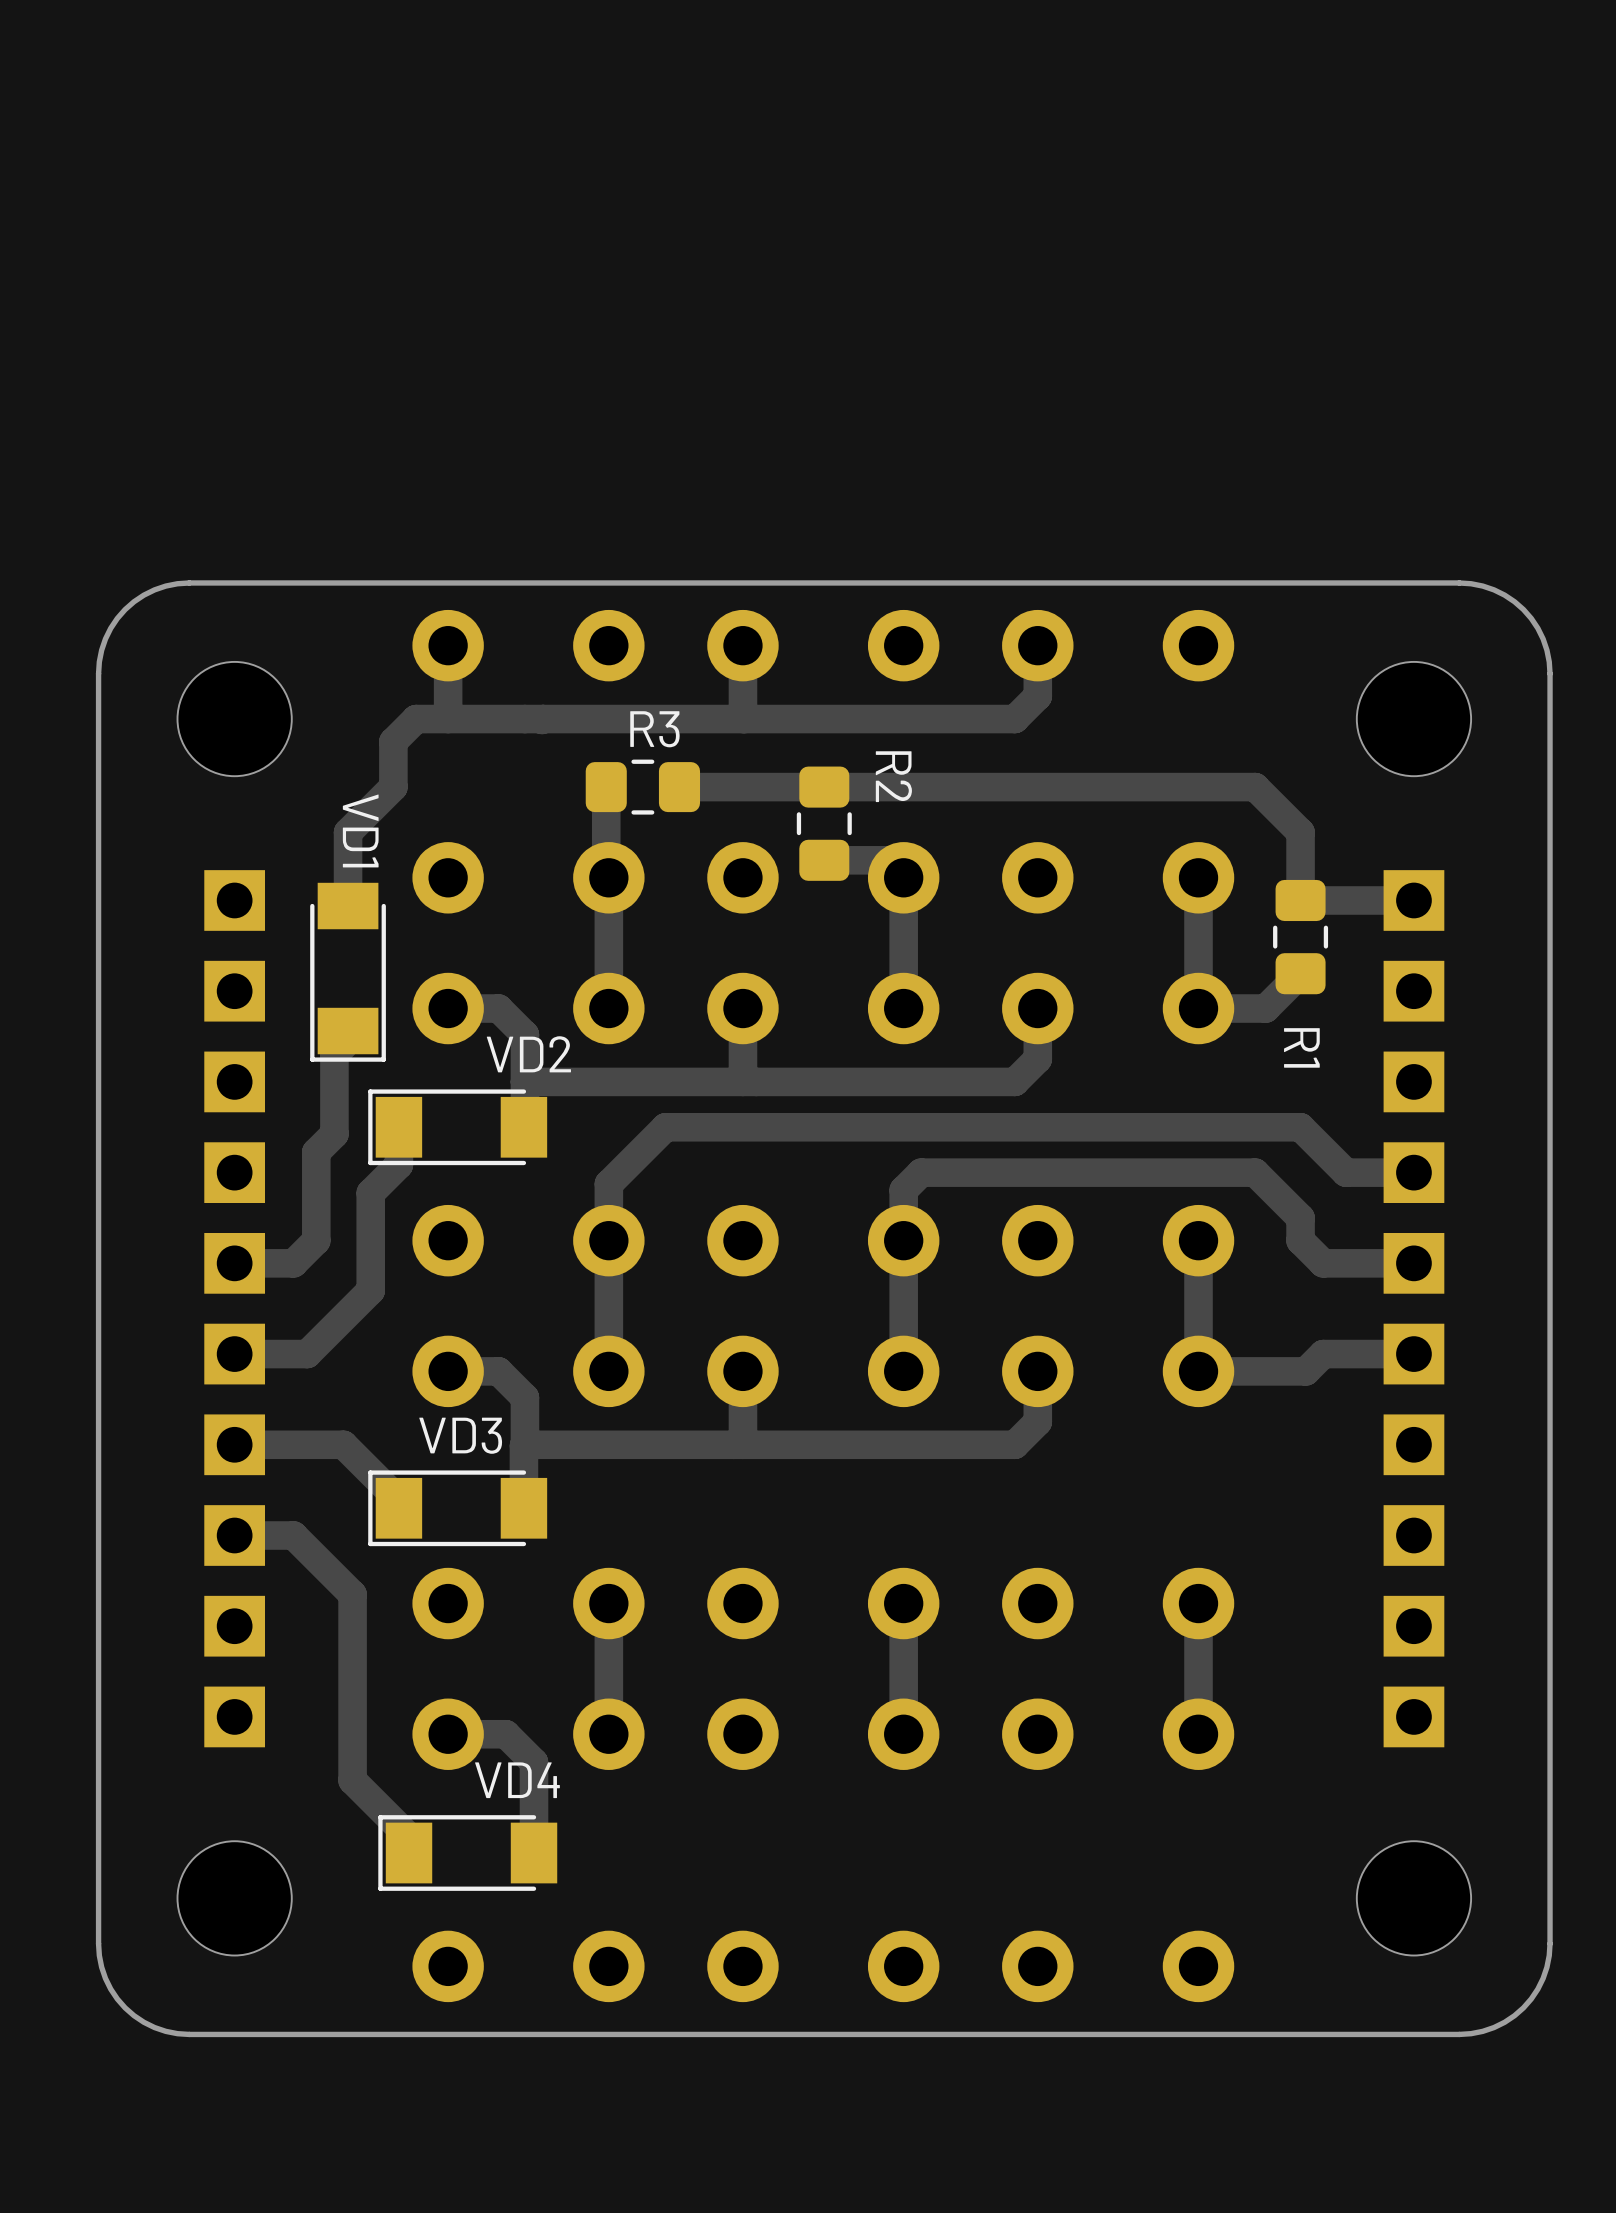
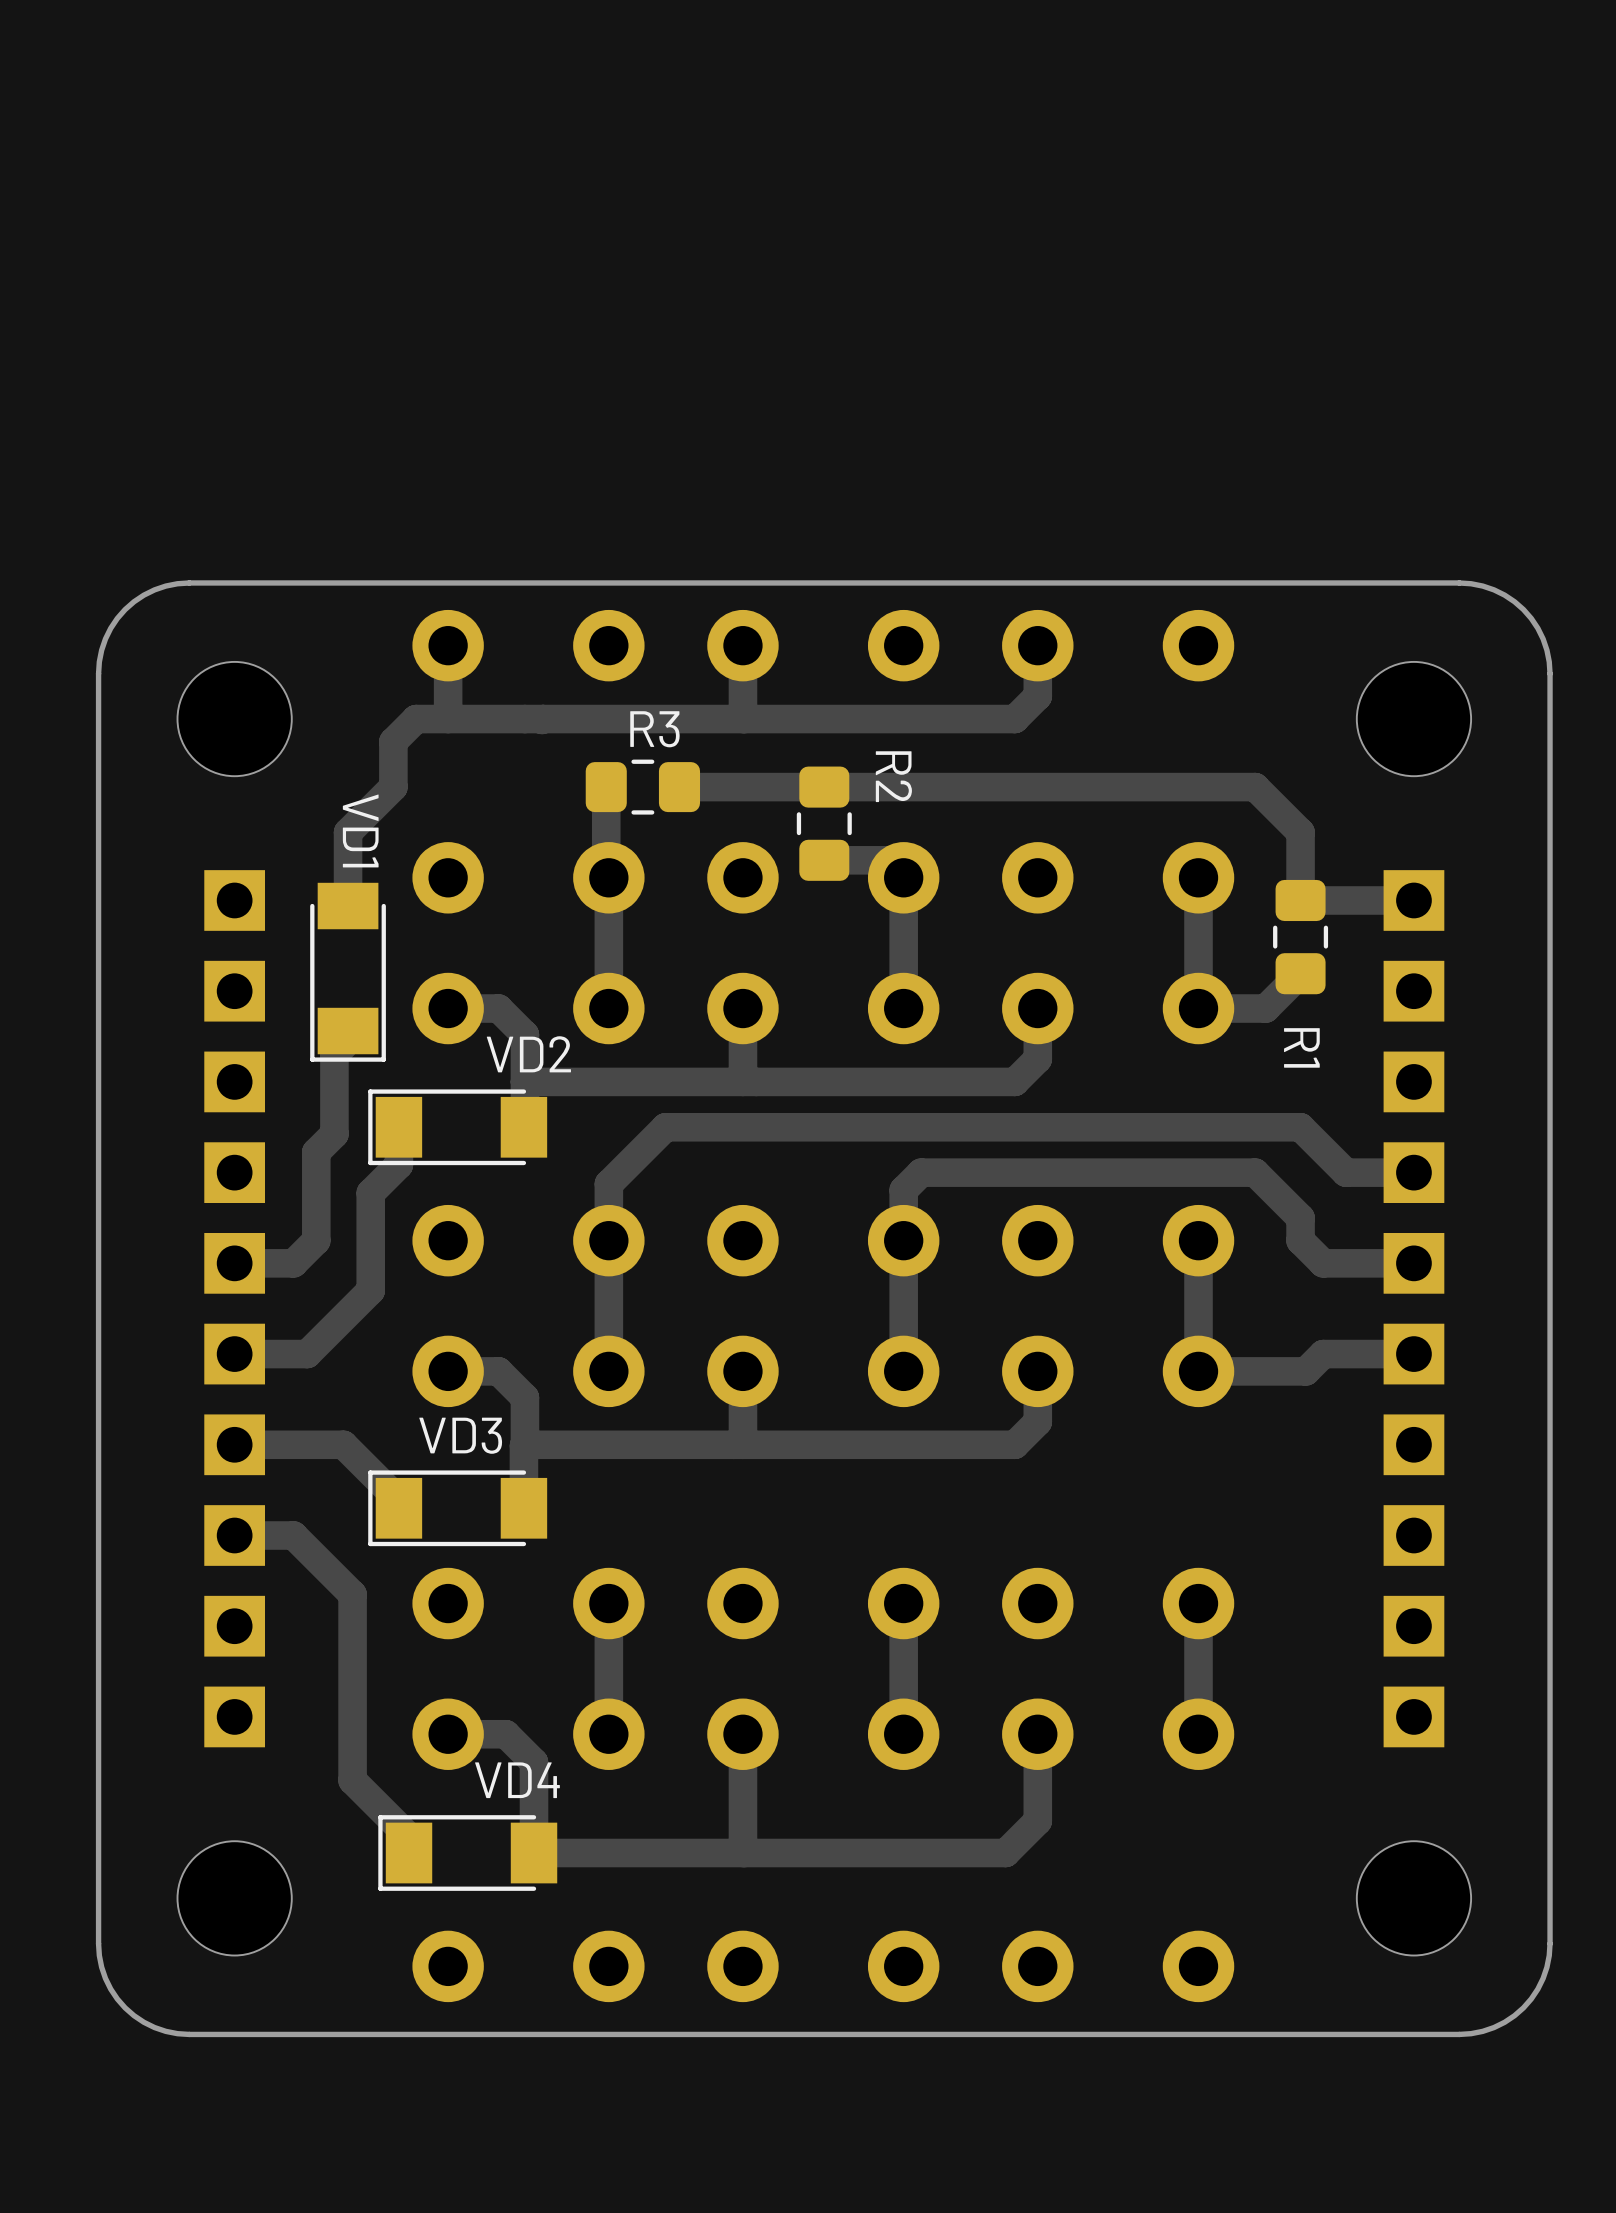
track: none -> (742, 1734) (742, 1853)
track: none -> (1037, 1734) (1037, 1820) (1005, 1853) (534, 1853)

